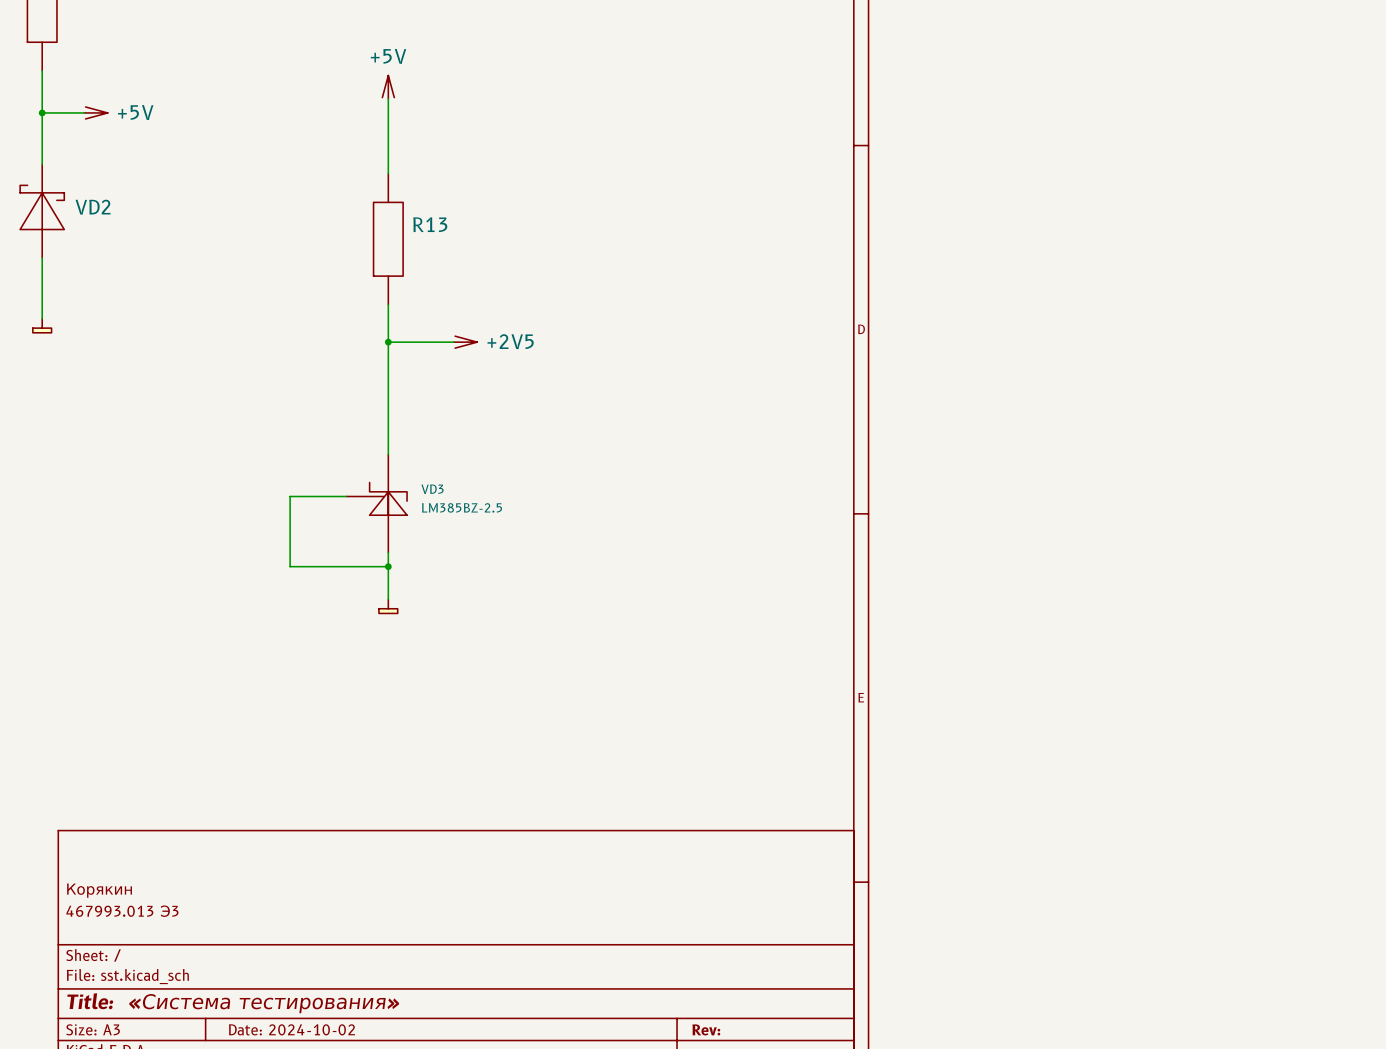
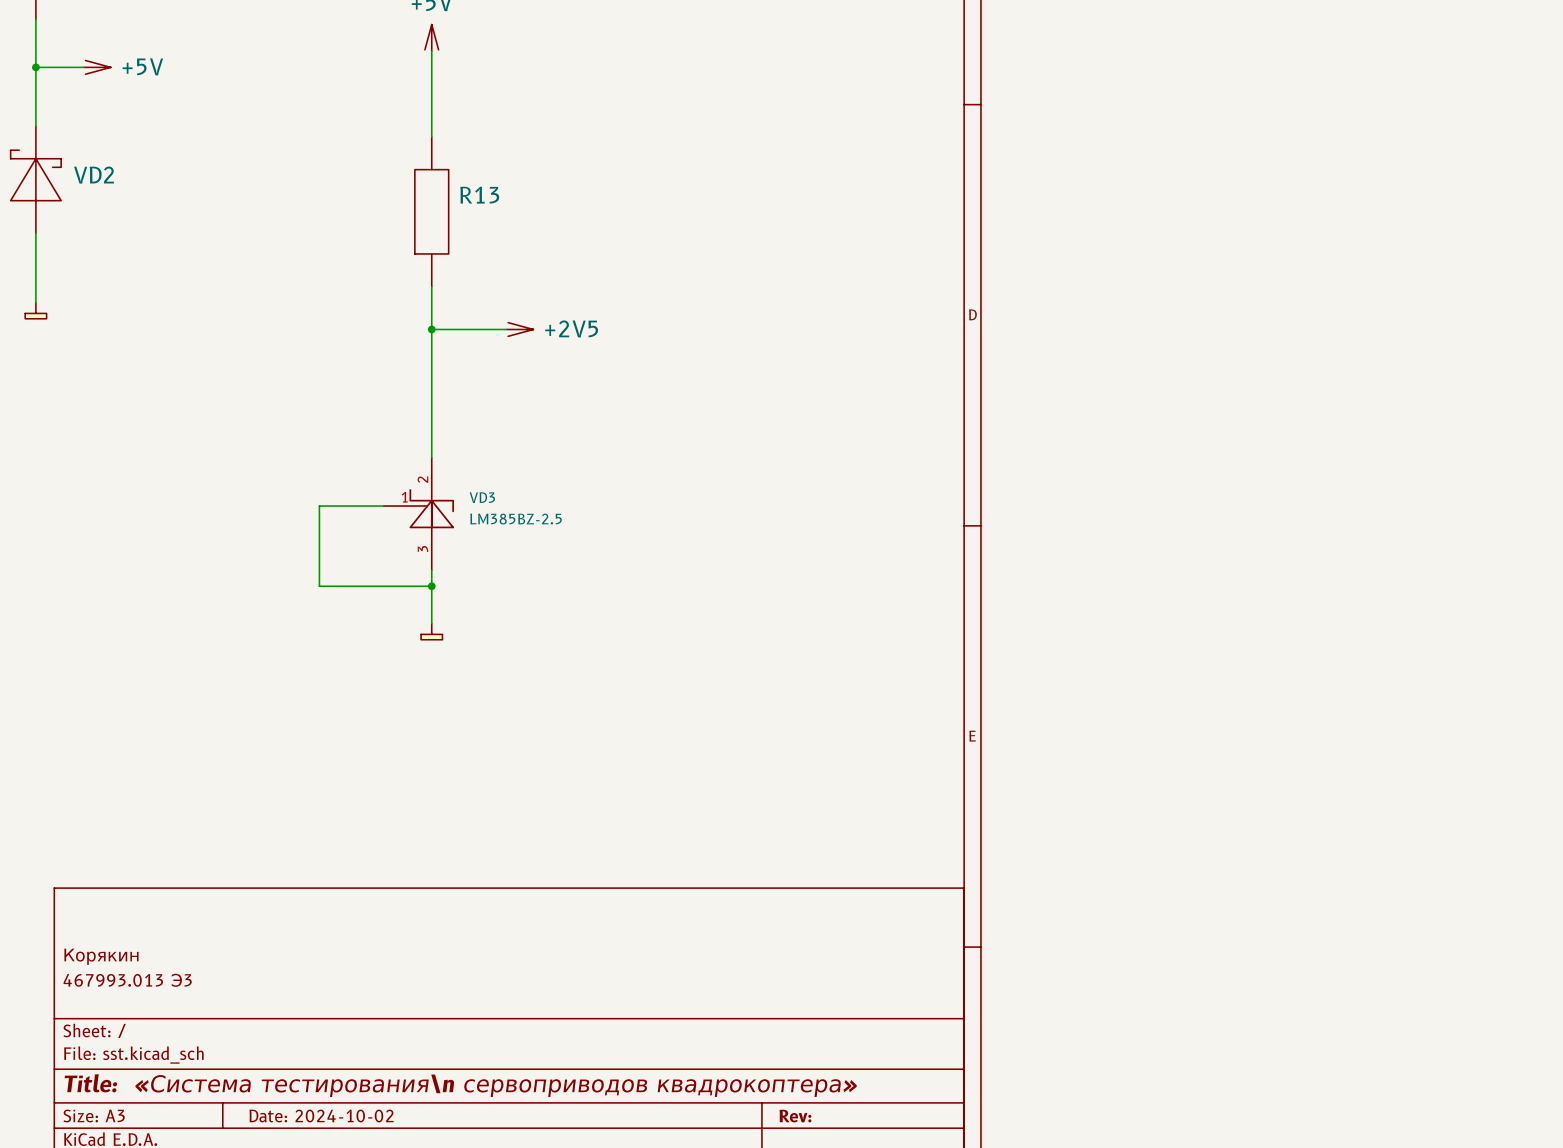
VD3 pin number: none -> 2 (422, 479)
VD3 pin number: none -> 1 (404, 497)
VD3 pin number: none -> 3 (423, 548)
title block: Title: «Система тестирования» (233, 1003) -> Title: «Система тестирования\n сервоприводов квадрокоптера» (460, 1085)

